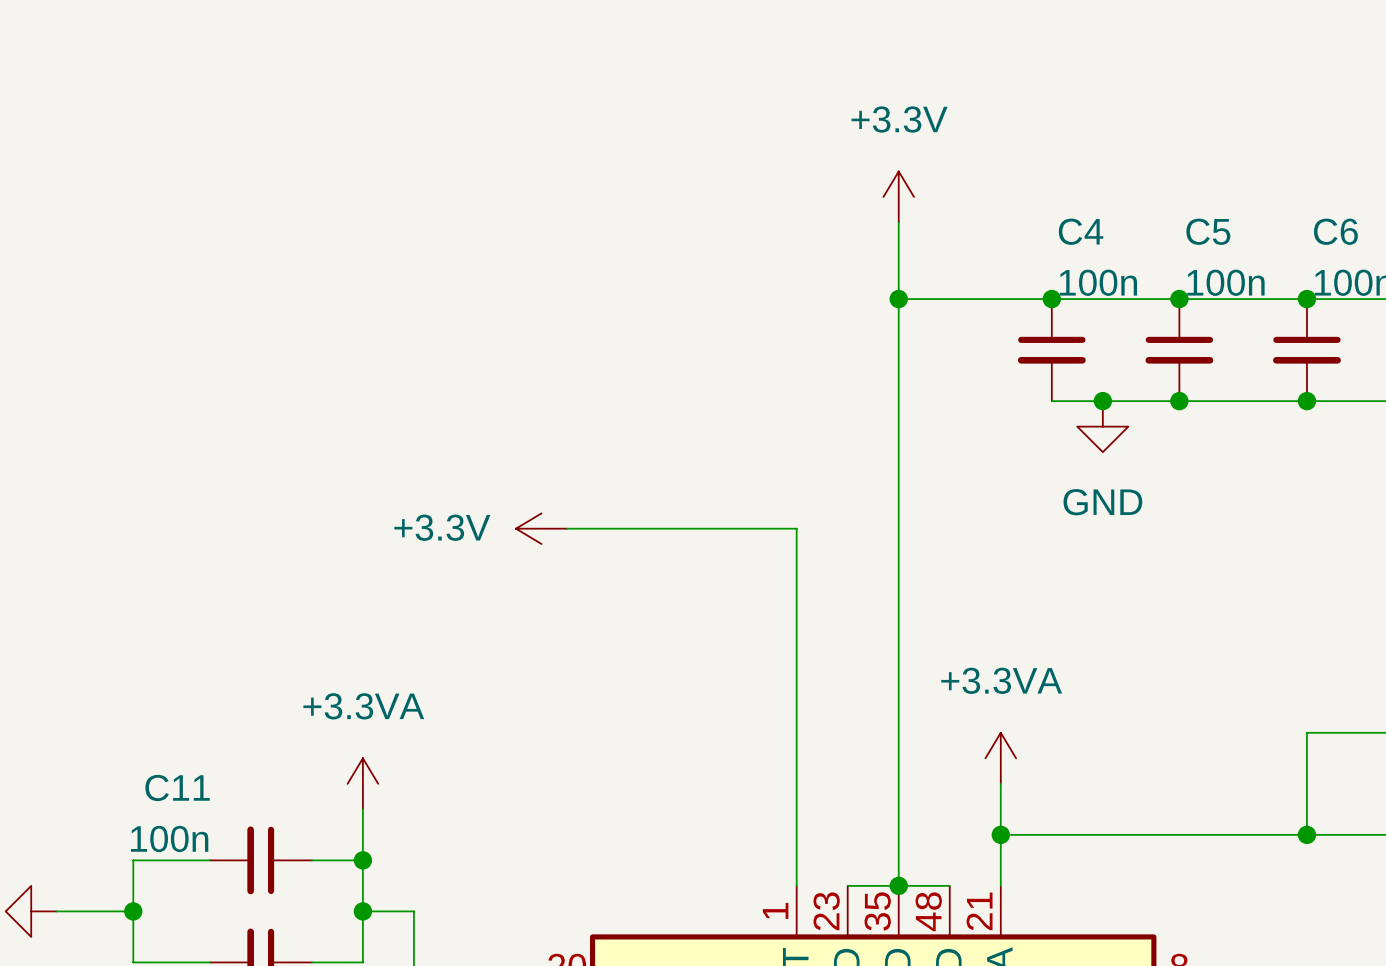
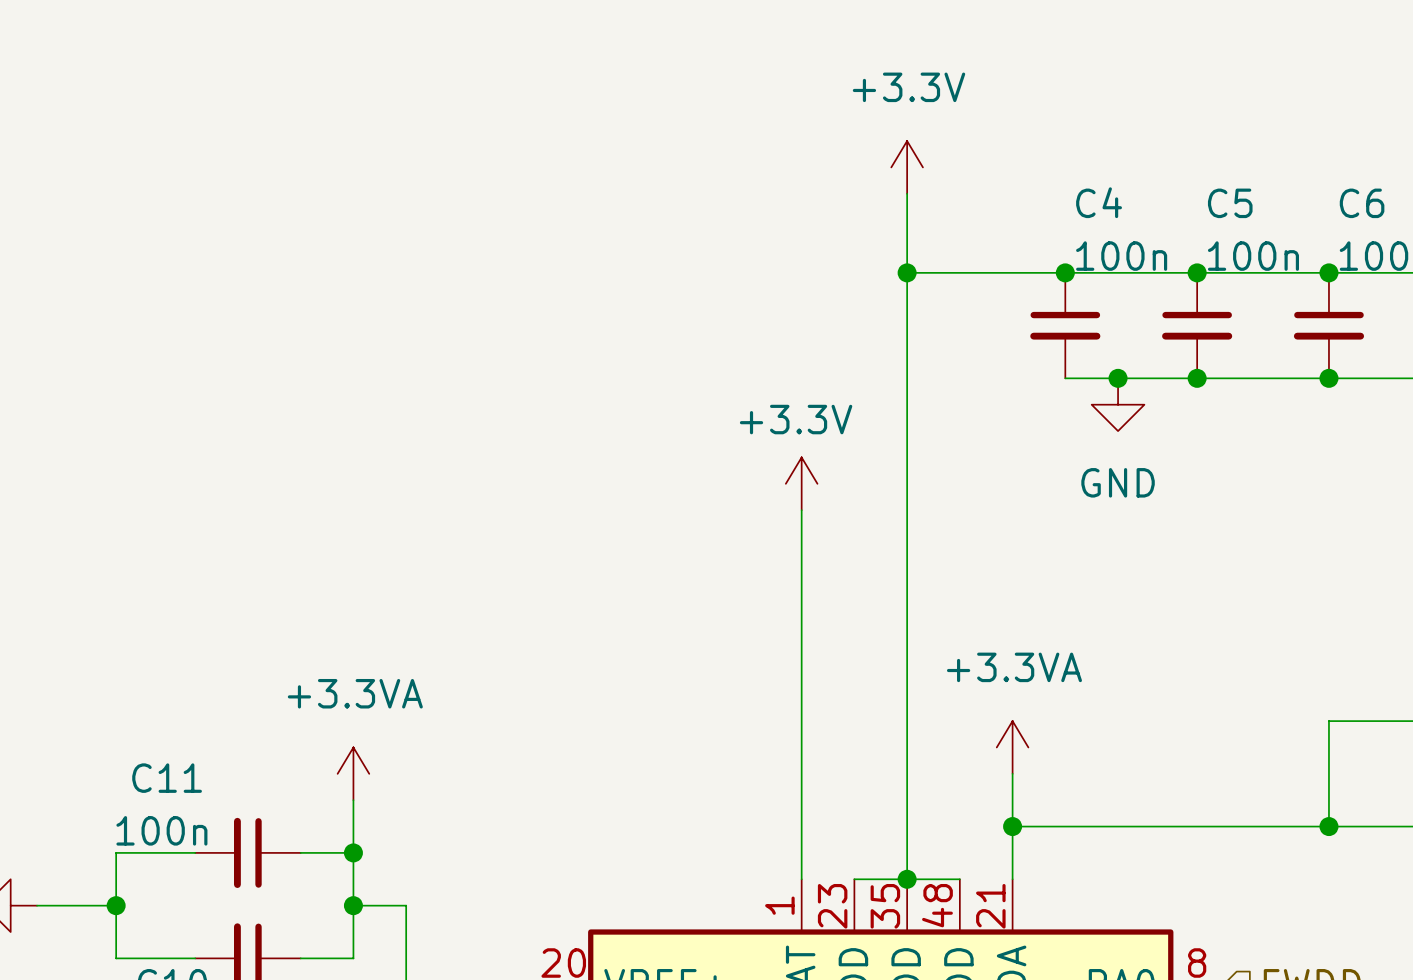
power symbol text position: +3.3V (442, 527) -> +3.3V (796, 419)
power symbol rotation: 0° (541, 528) -> 90° clockwise (801, 483)
power symbol position: +3.3V (541, 528) -> +3.3V (801, 483)
wire: (567, 528) (796, 528) -> none

